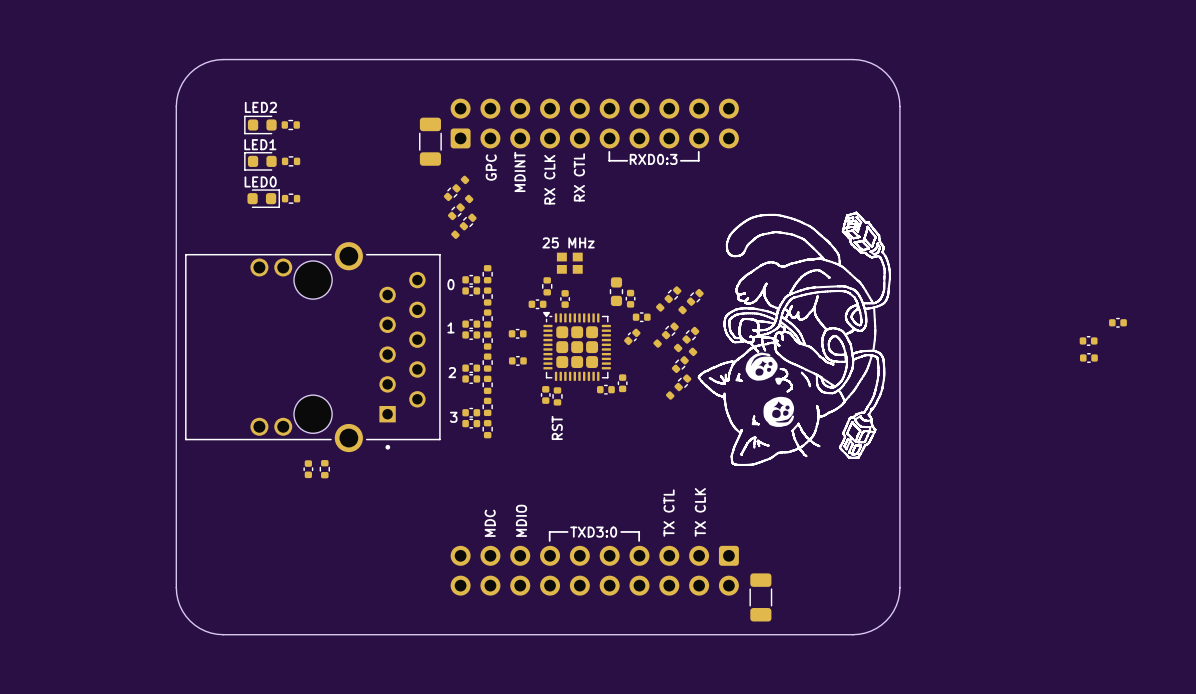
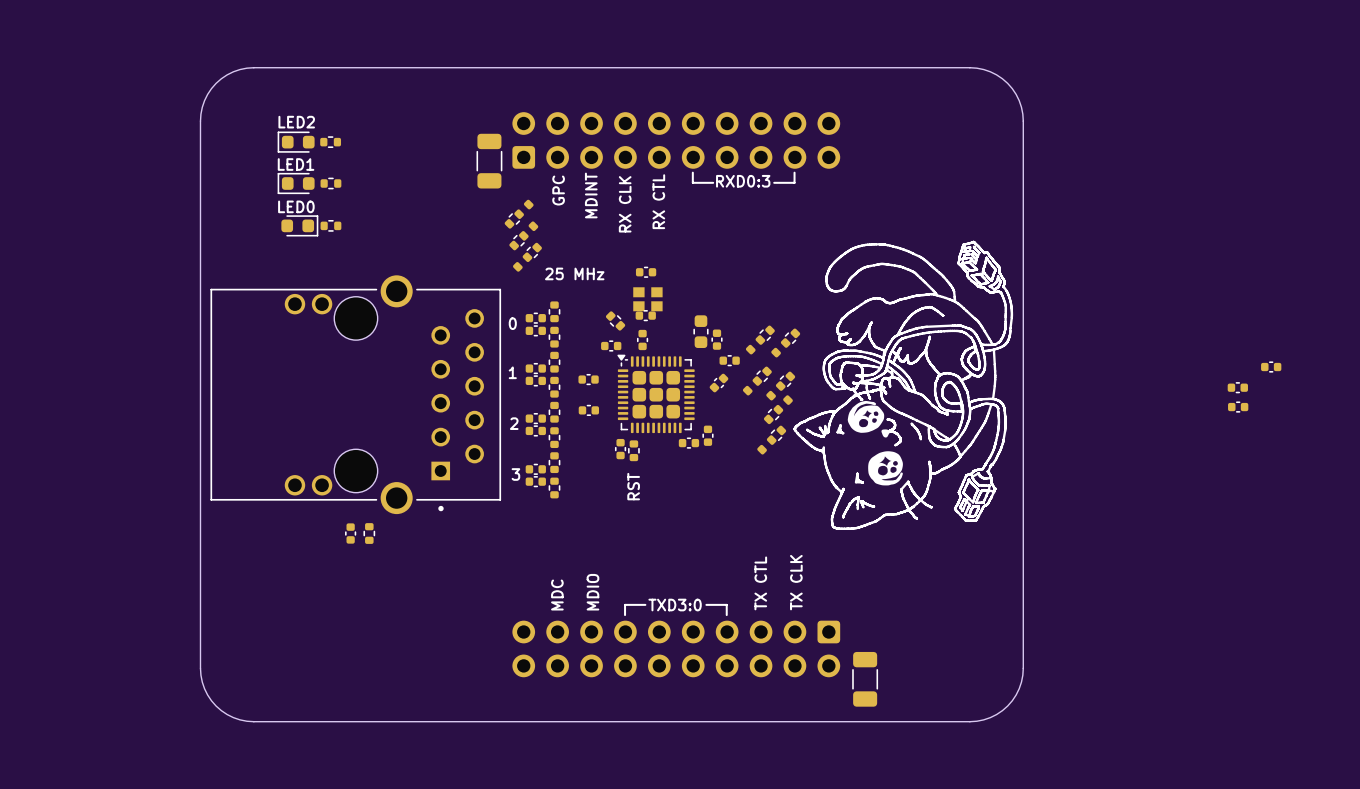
part: none -> (646, 272)
text position: 25 MHz (568, 242) -> 25 MHz (574, 273)
part: none -> (645, 315)
part rotation: 0° (547, 286) -> 45° counterclockwise (615, 320)

